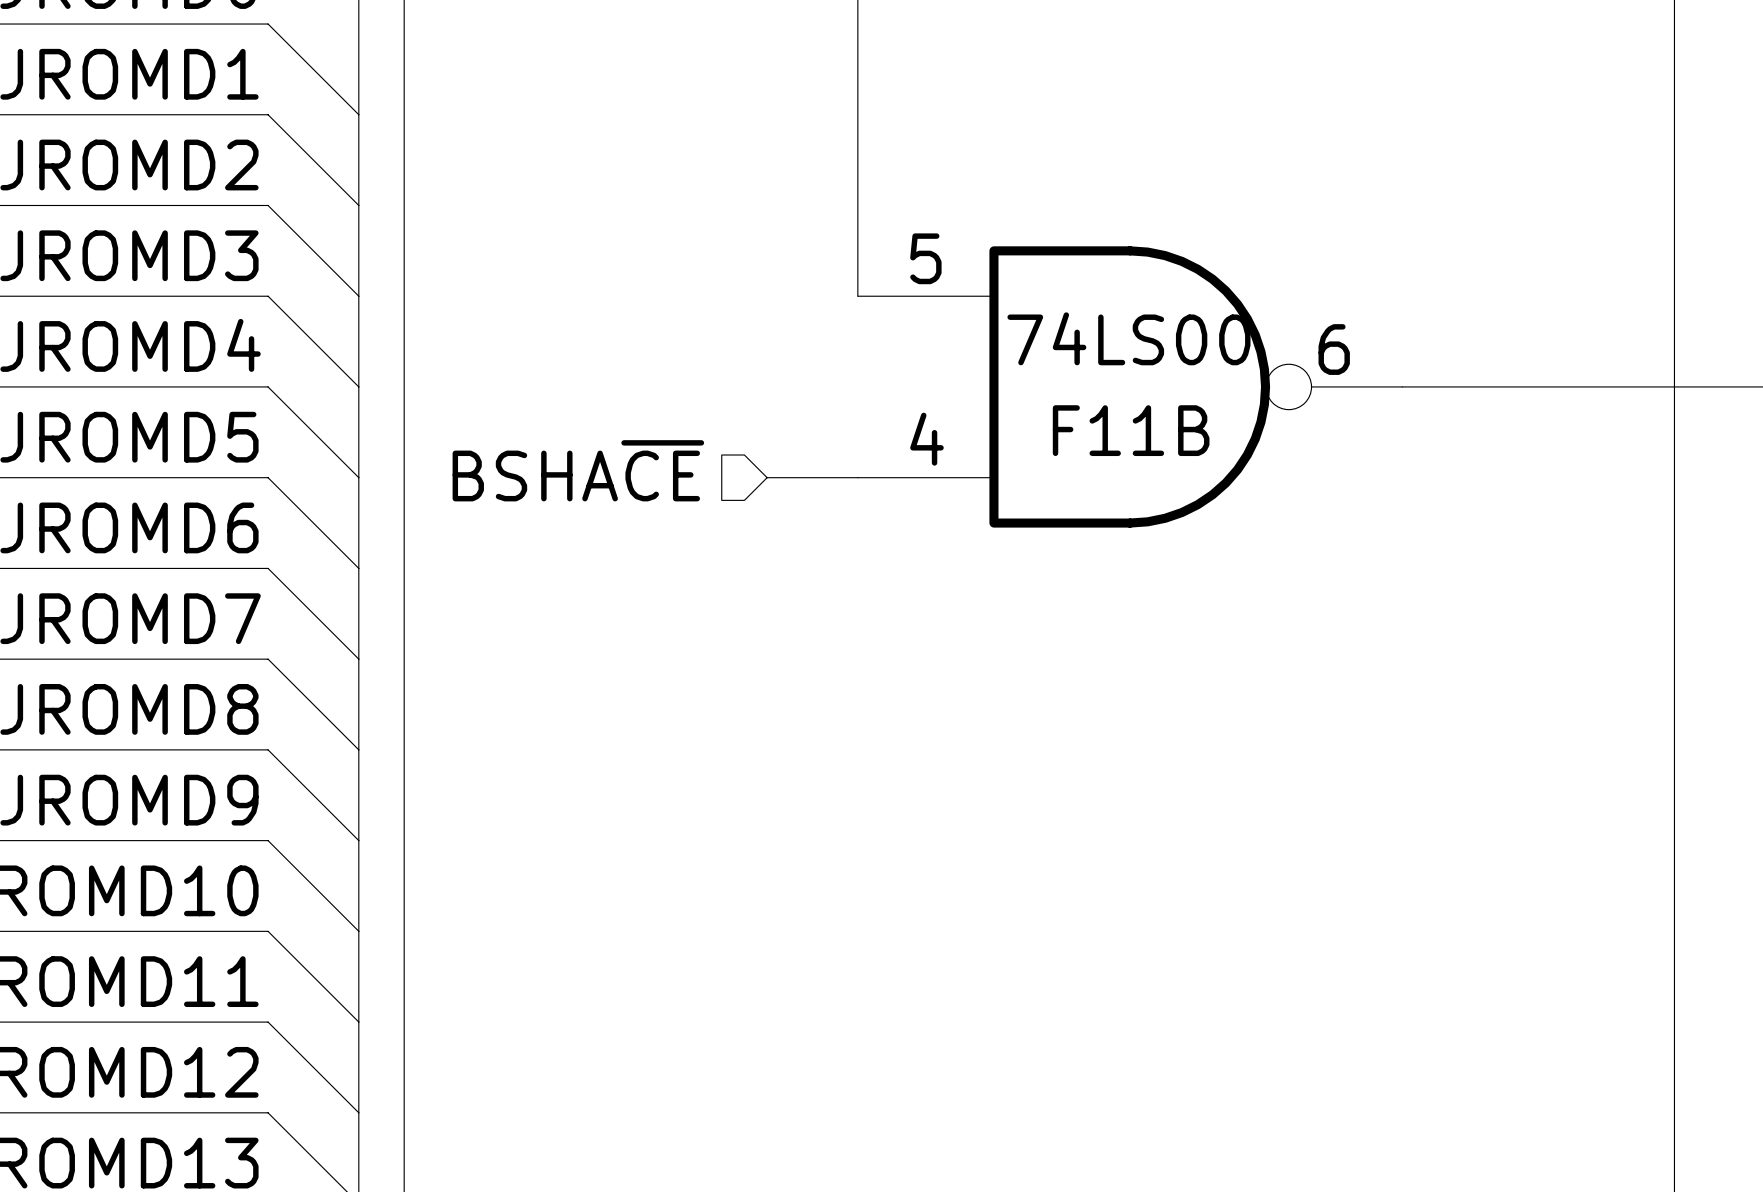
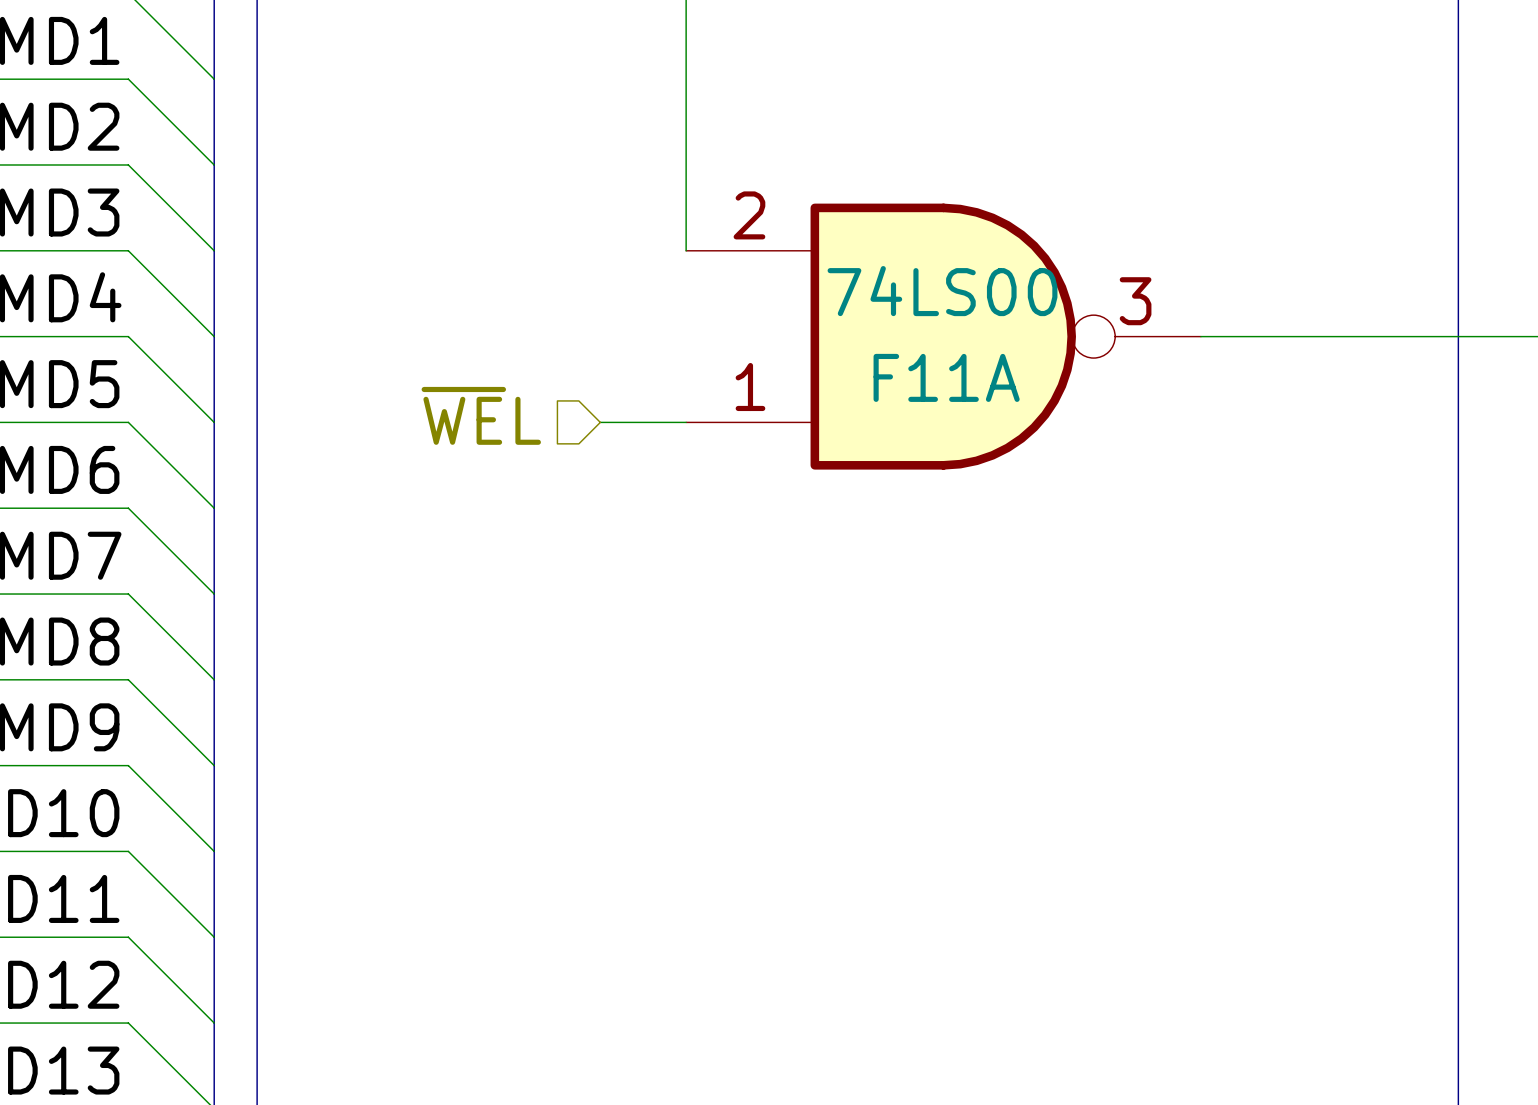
F11B pin number: 5 (925, 258) -> 2 (749, 215)
F11B pin number: 6 (1334, 349) -> 3 (1135, 301)
F11B name: F11B (1131, 430) -> F11A (946, 377)
F11B pin number: 4 (926, 439) -> 1 (750, 387)
hierarchical label: BSHA~{CE} (578, 470) -> ~{WE}L (481, 415)

